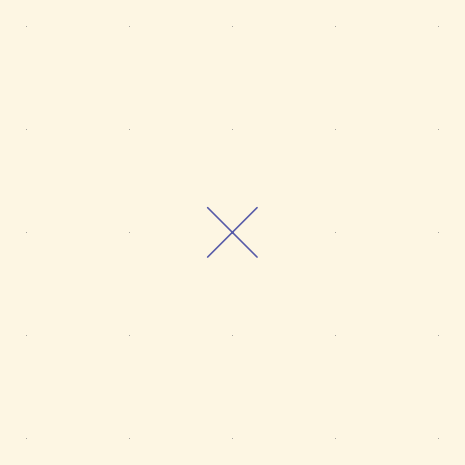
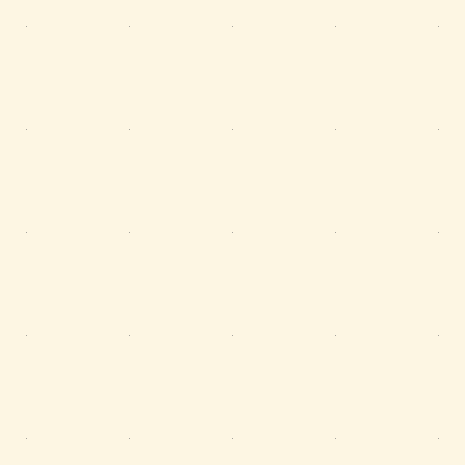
no-connect mark: (232, 232) -> none

